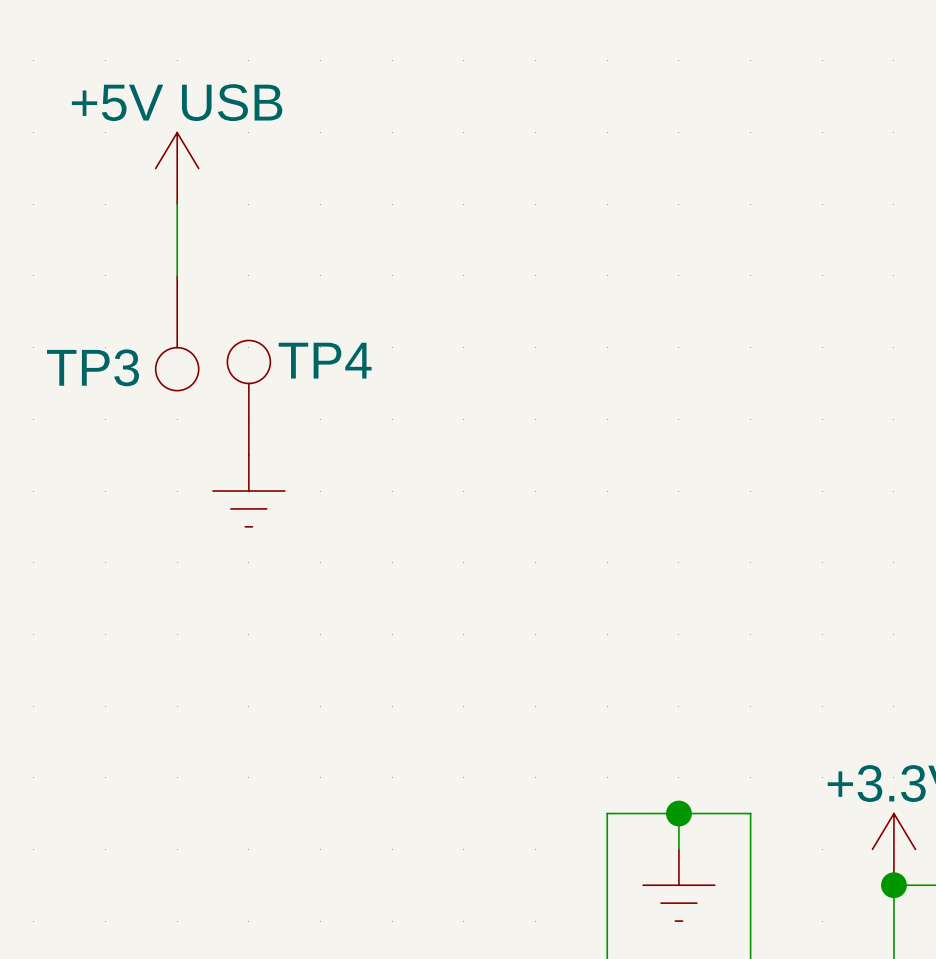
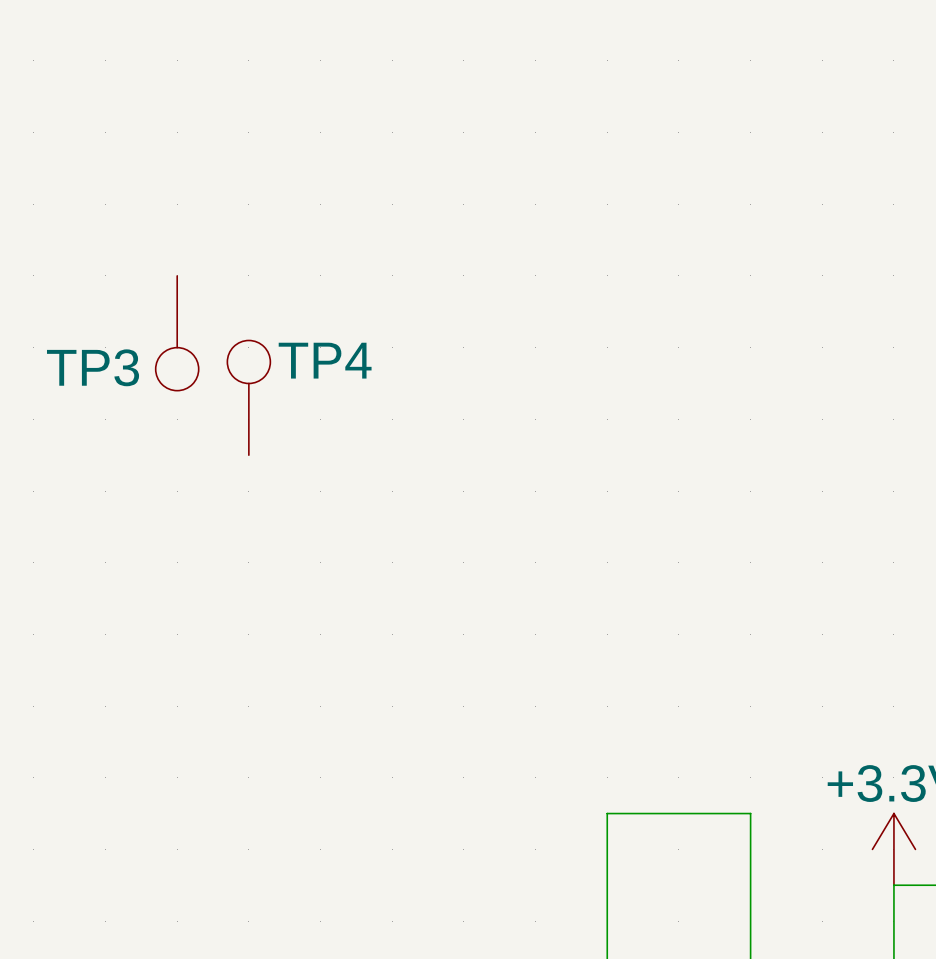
power symbol: +5V USB (177, 168) -> none
wire: (177, 204) (177, 275) -> none
power symbol: (248, 491) -> none
wire: (678, 813) (678, 849) -> none
junction: (678, 813) -> none
power symbol: (678, 885) -> none
junction: (893, 885) -> none

